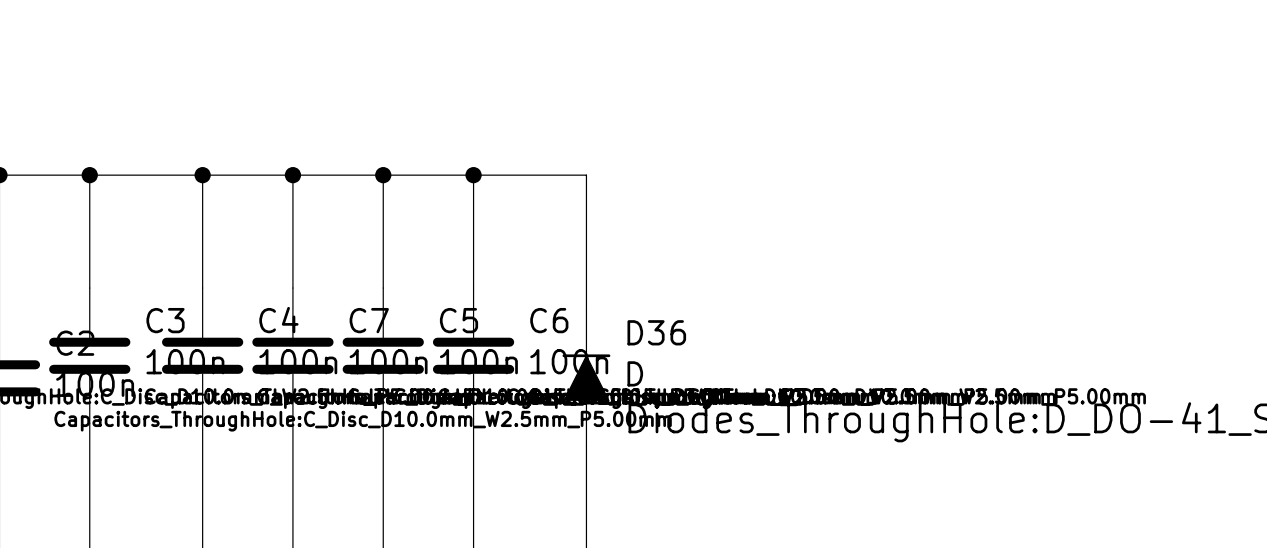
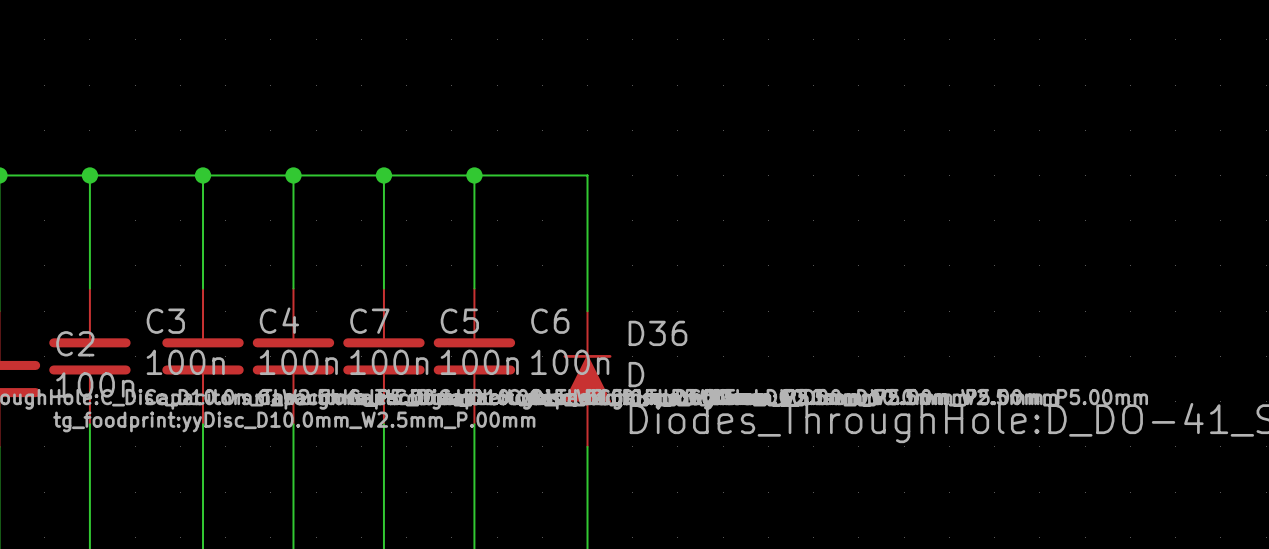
C2 text: Capacitors_ThroughHole:C_Disc_D10.0mm_W2.5mm_P5.00mm (363, 421) -> tg_foodprint:yyDisc_D10.0mm_W2.5mm_P.00mm (294, 421)

